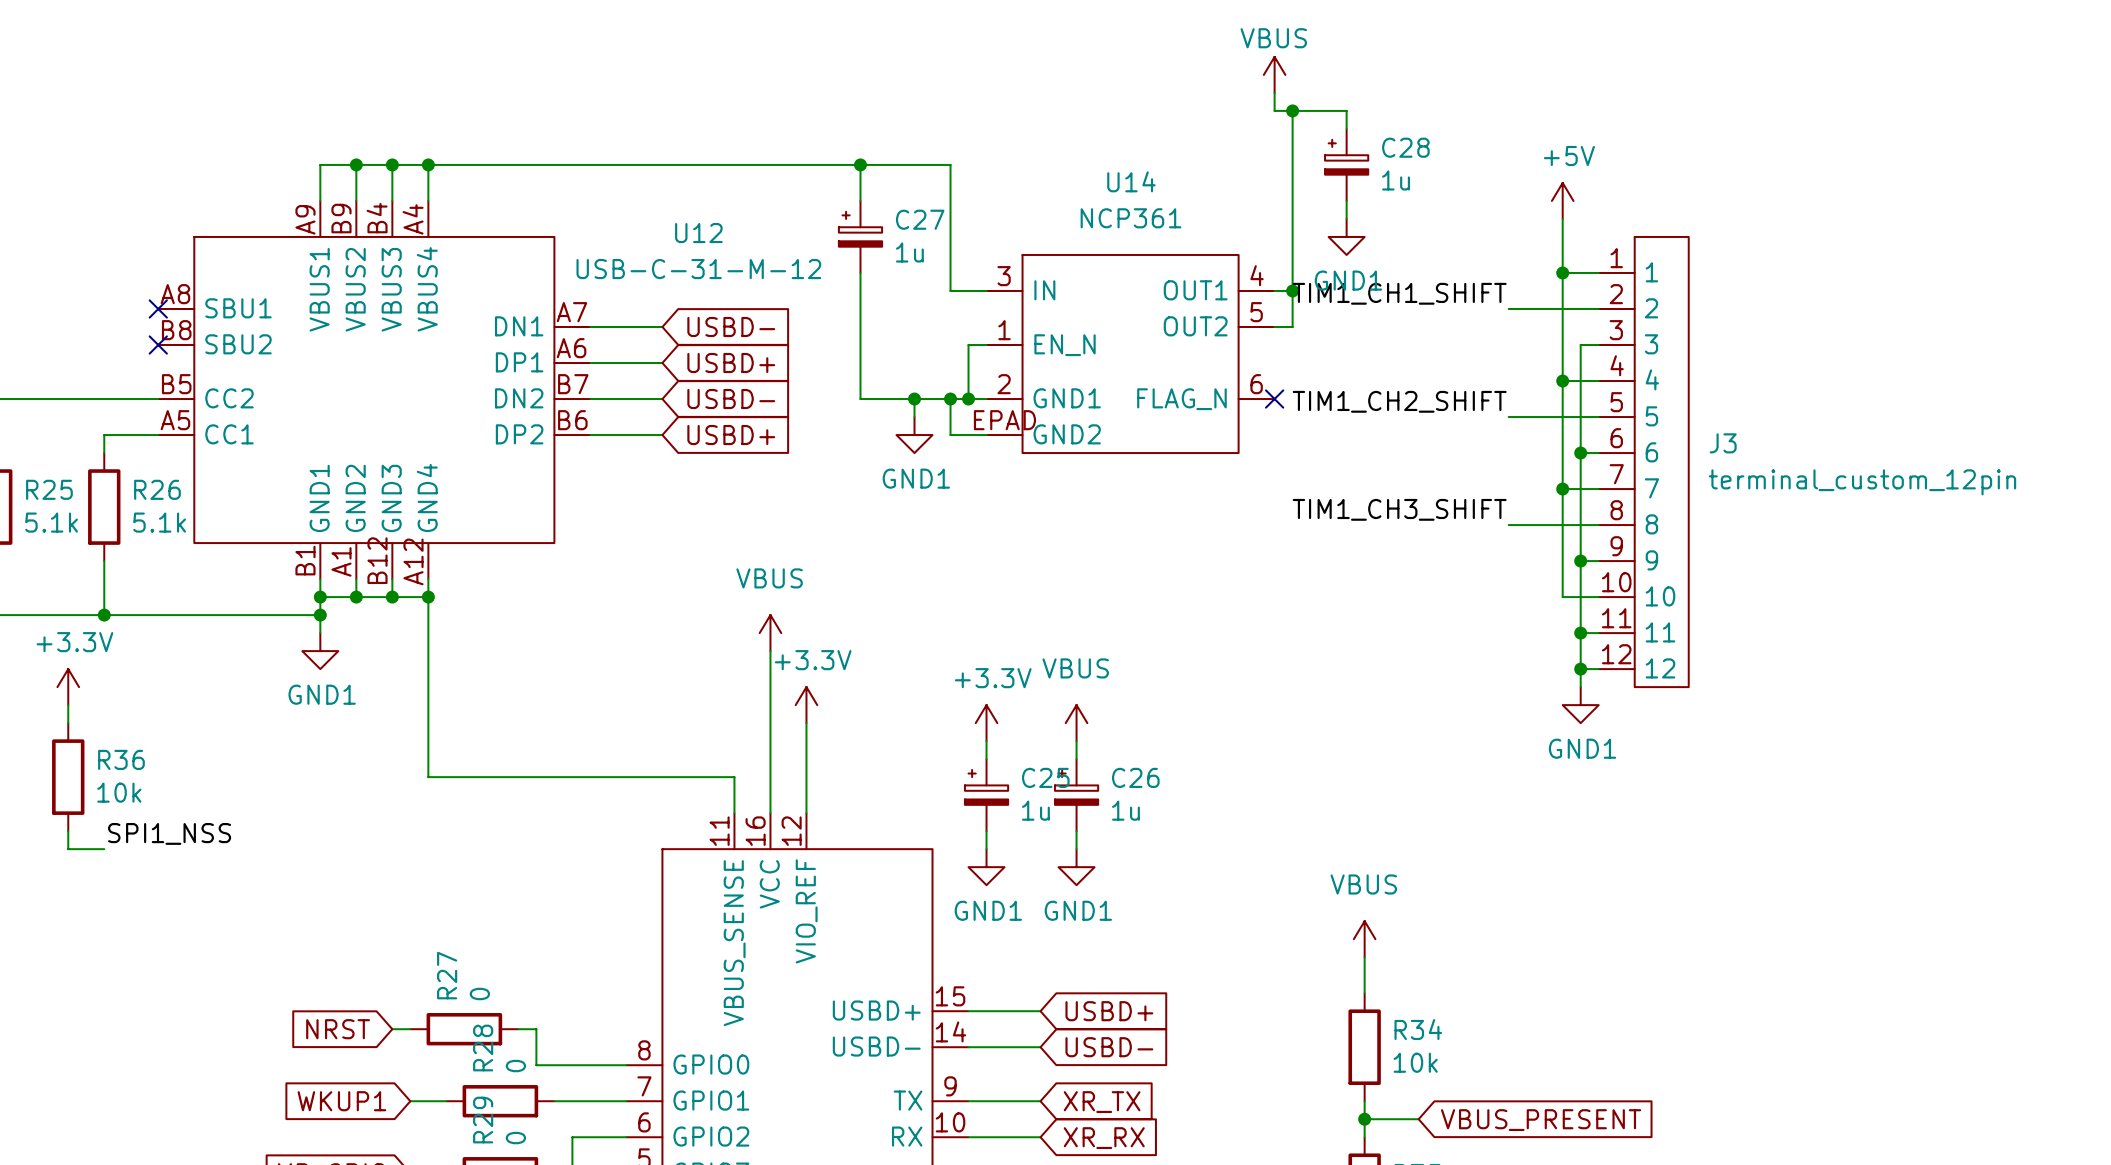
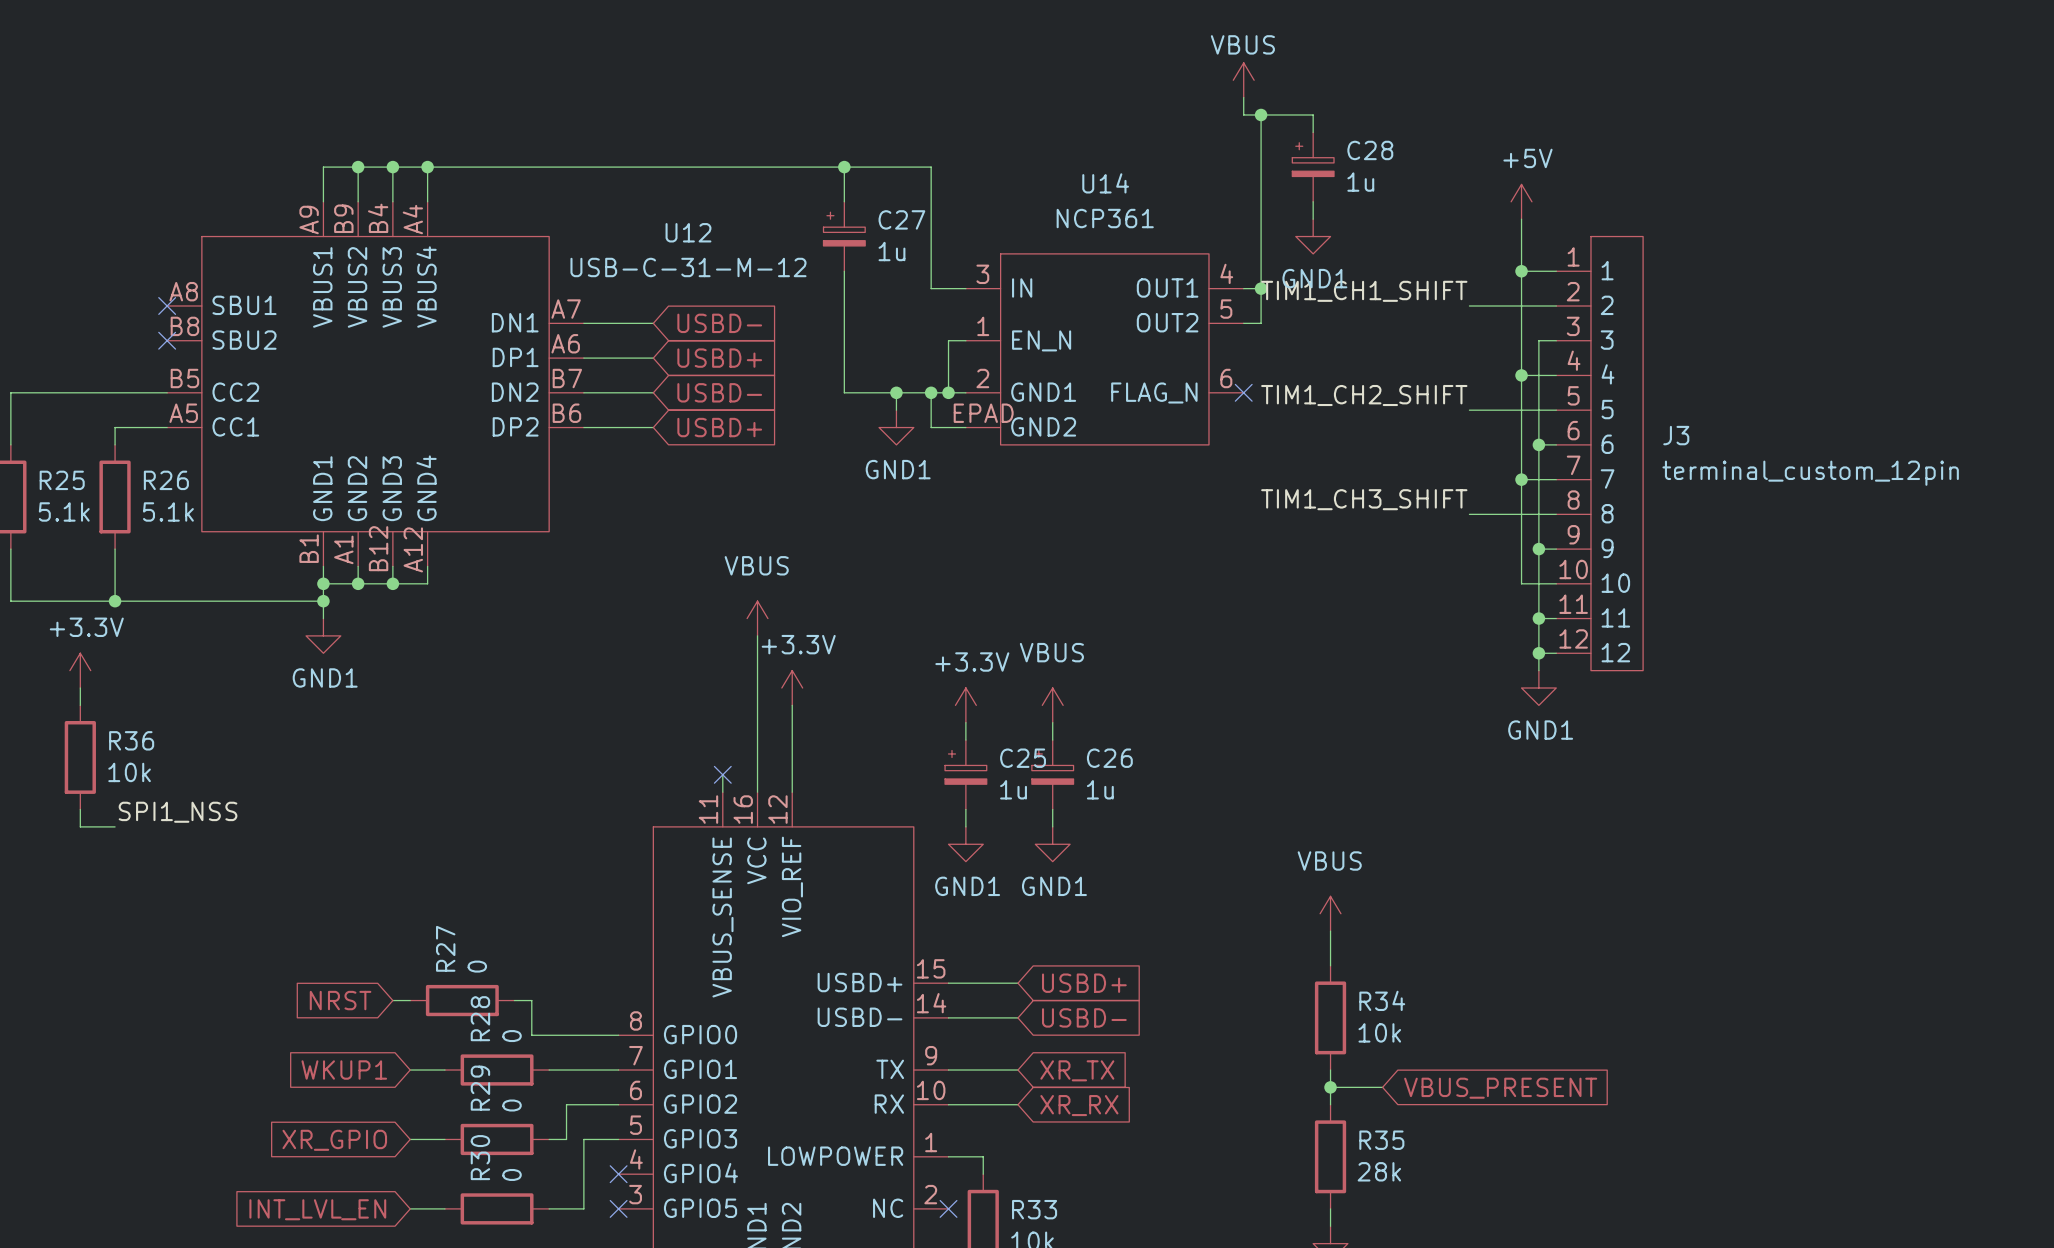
wire: (428, 597) (428, 777) (734, 777) (734, 795) -> none
junction: (428, 597) -> none
no-connect mark: none -> (722, 774)

